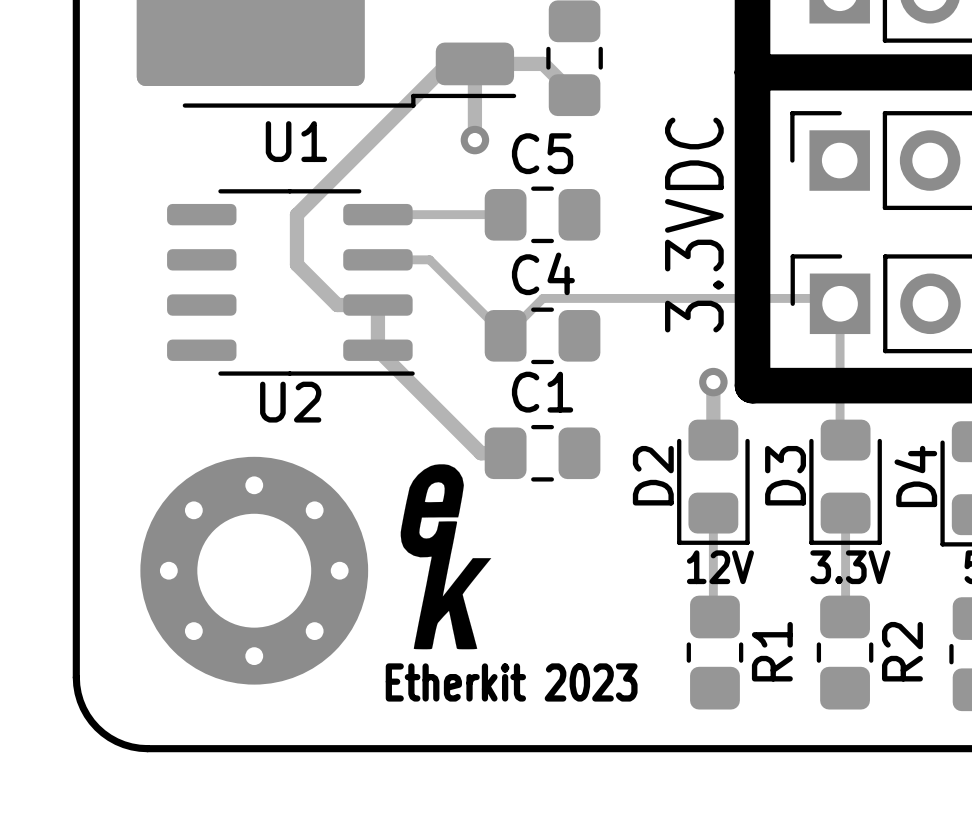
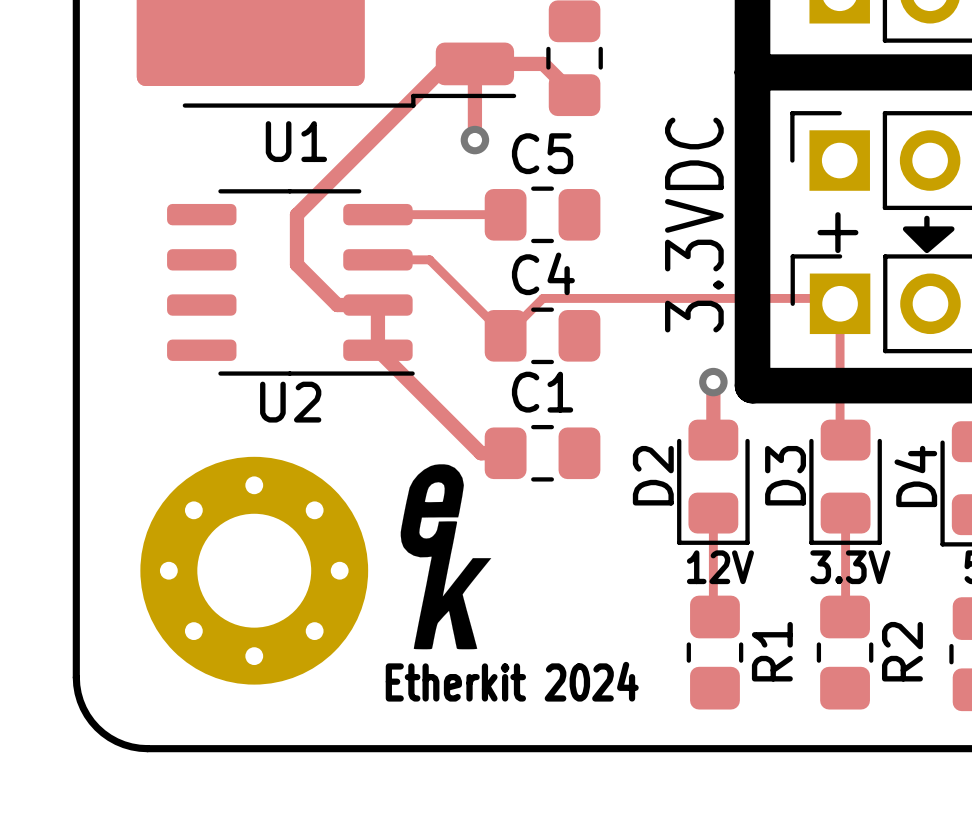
line: none -> (837, 214) (837, 250)
line: none -> (926, 218) (926, 229)
drawing: none -> [902, 226, 955, 254]
line: none -> (820, 232) (855, 232)
text: Etherkit 2023 (511, 682) -> Etherkit 2024 (512, 681)

